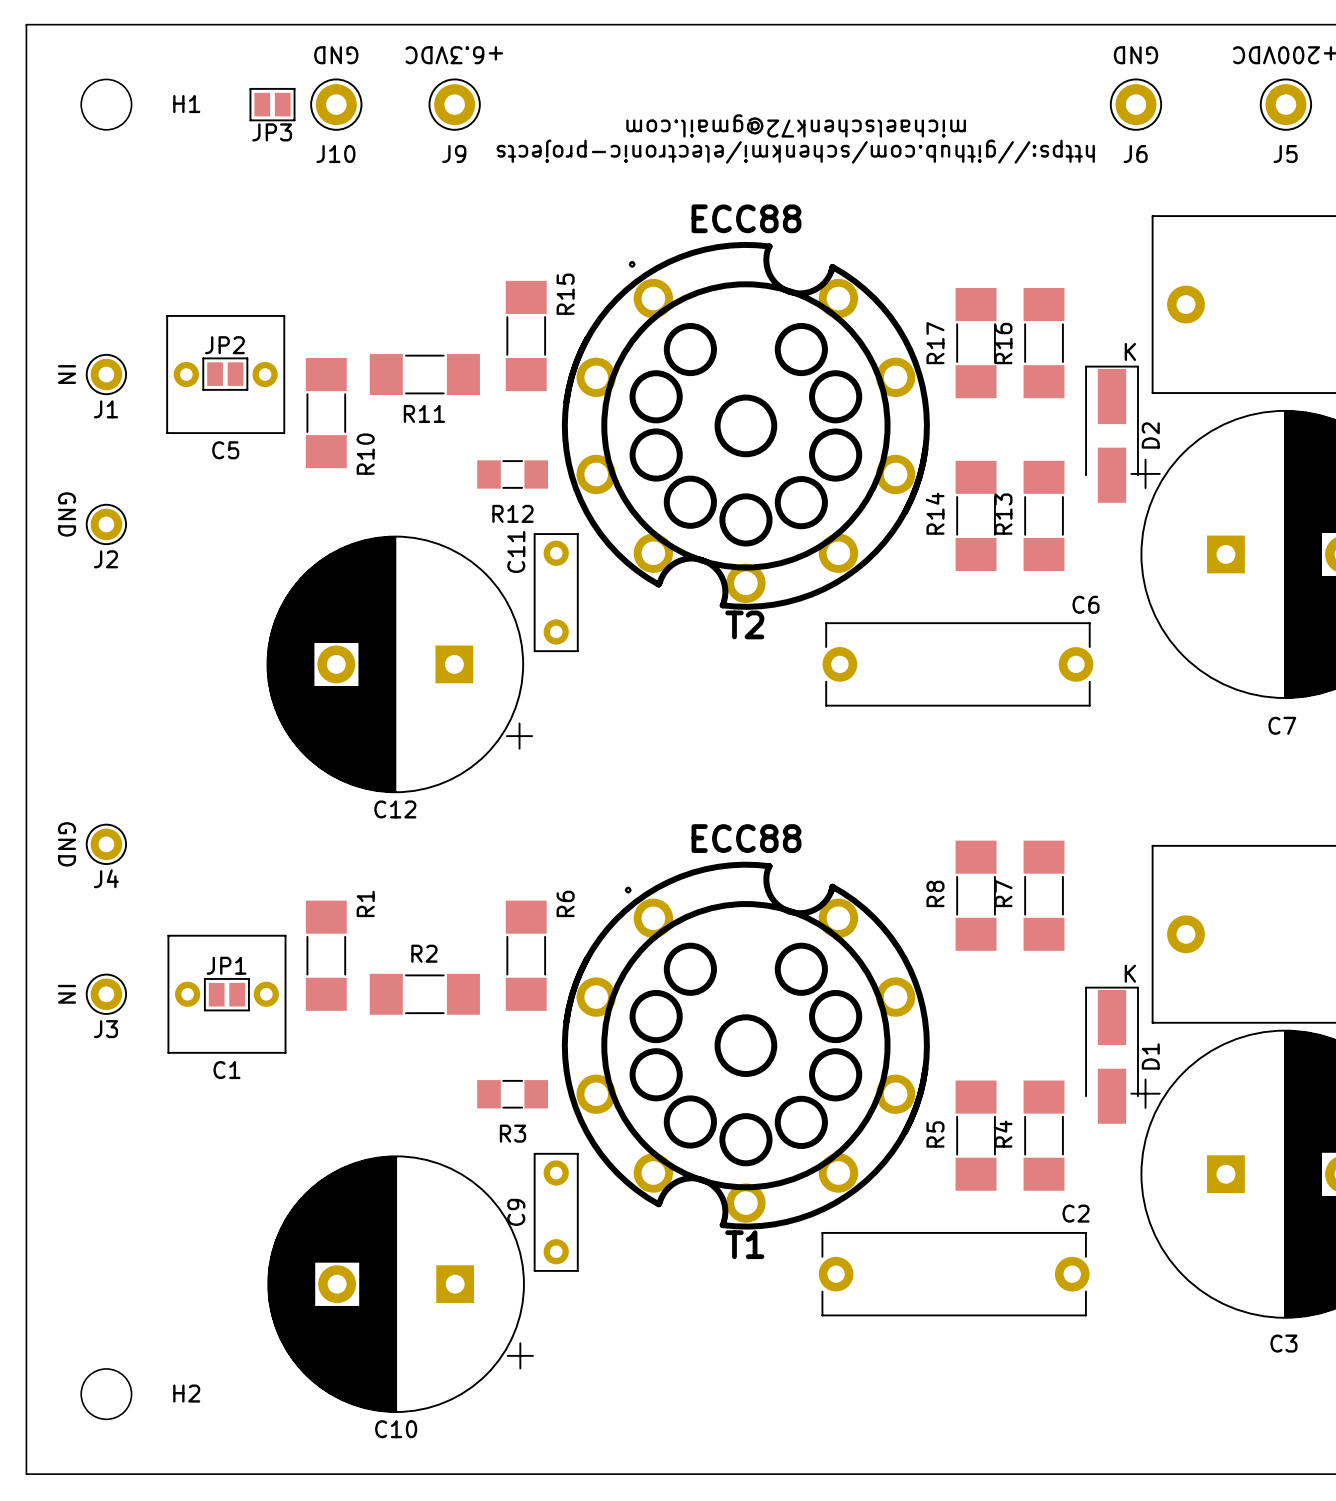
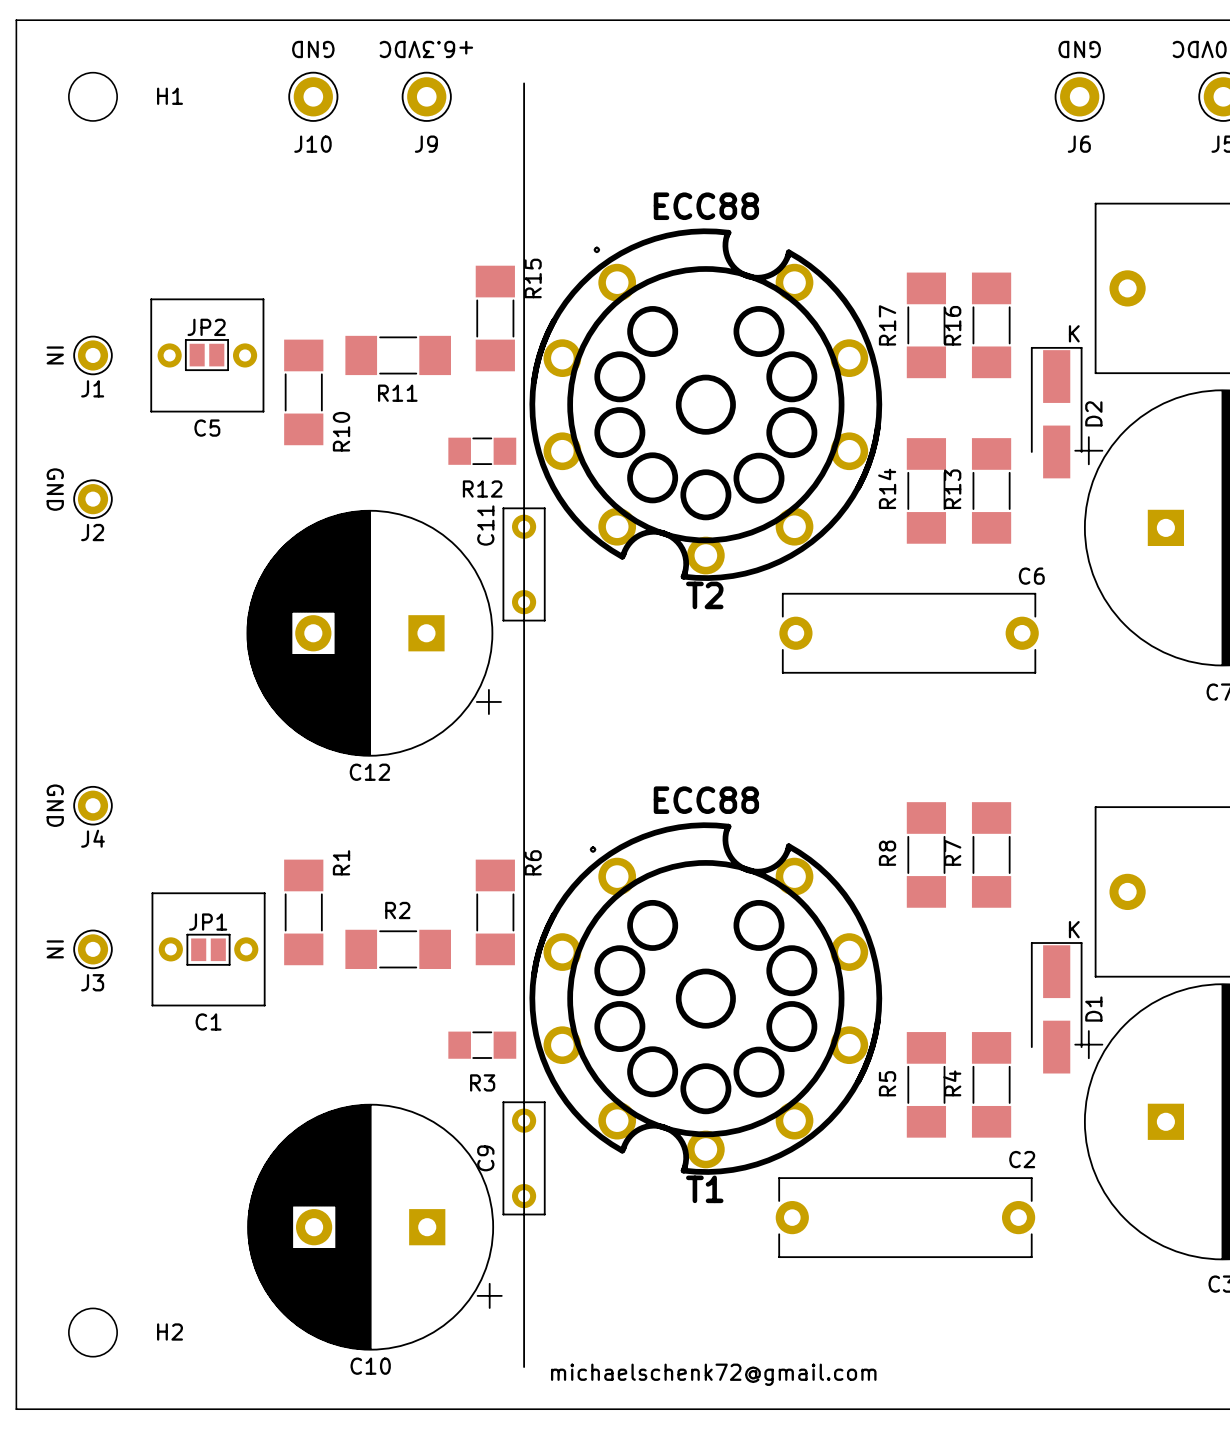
line: none -> (524, 83) (524, 1367)
JP3: (272, 104) -> none
text: michaelschenk72@gmail.com (796, 125) -> none
text: https://github.com/schenkmi/electronic-projects (795, 151) -> none
text: none -> michaelschenk72@gmail.com (713, 1374)

